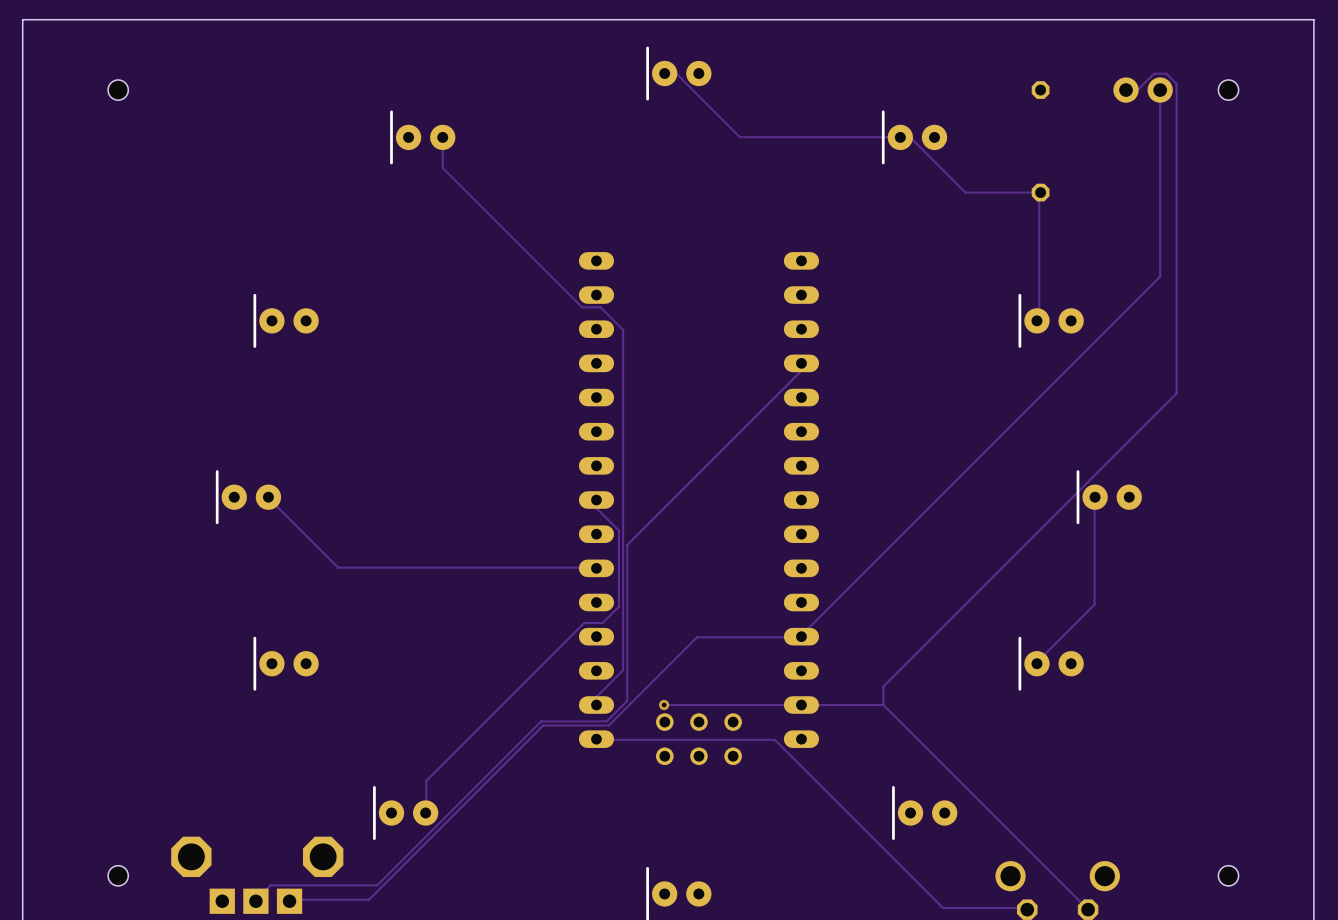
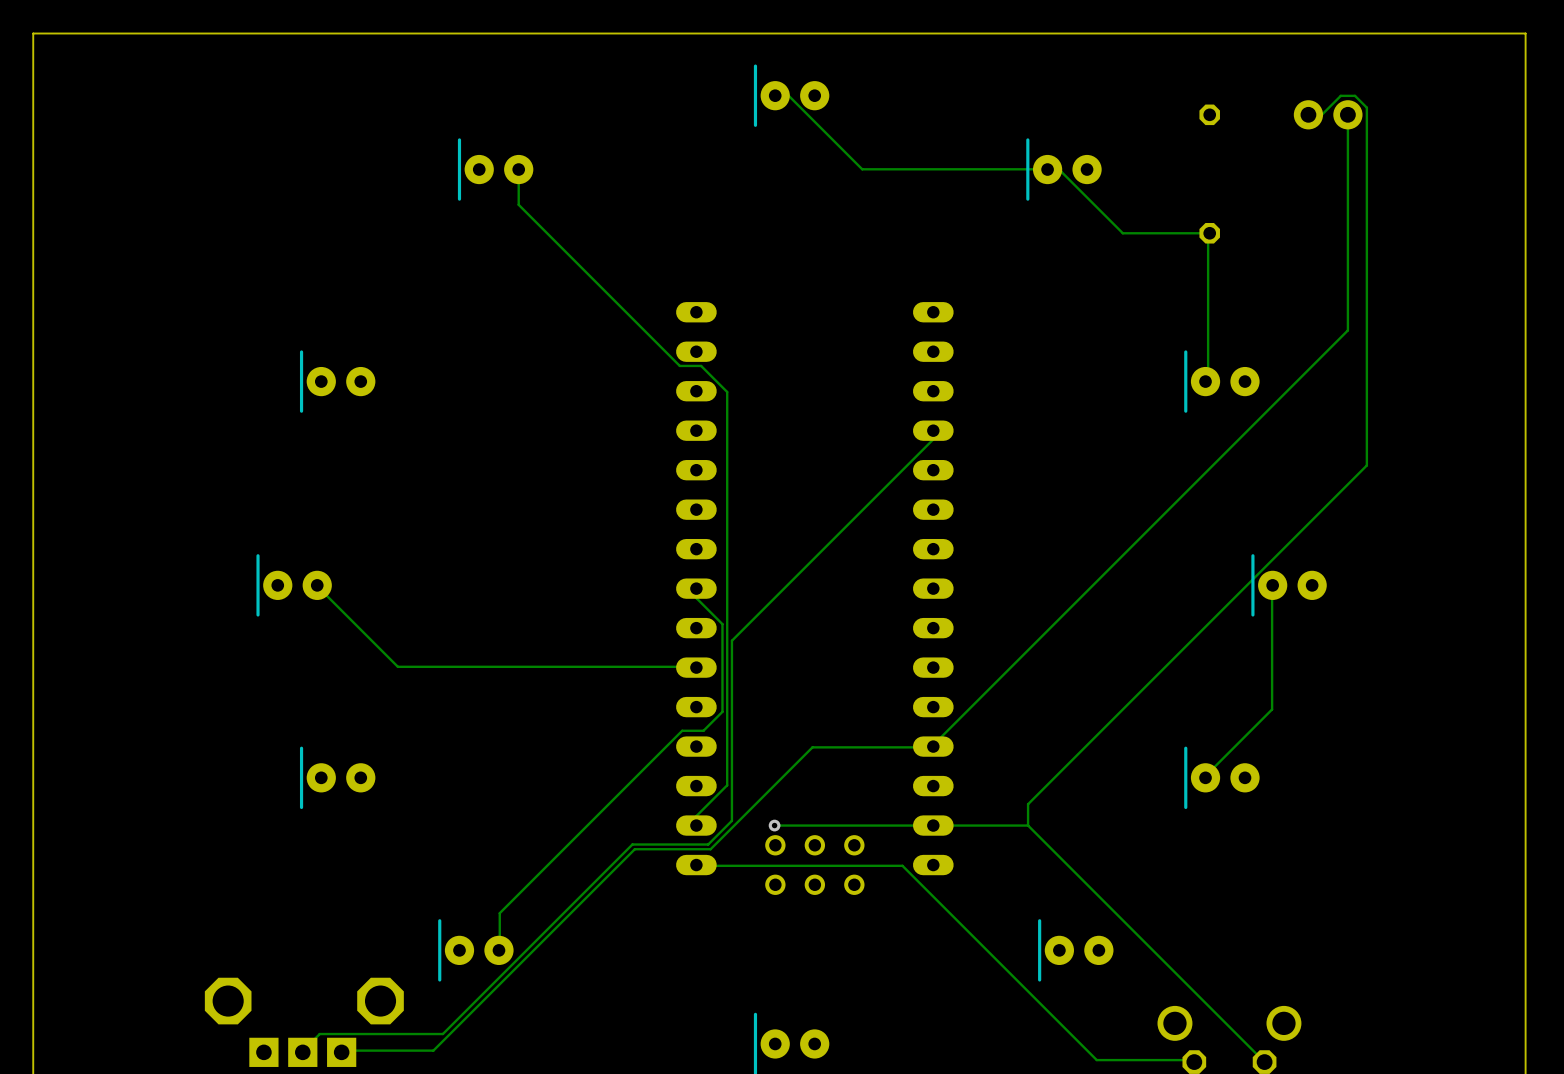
hole: (118, 90) -> none
hole: (1228, 90) -> none
hole: (118, 875) -> none
hole: (1228, 875) -> none

